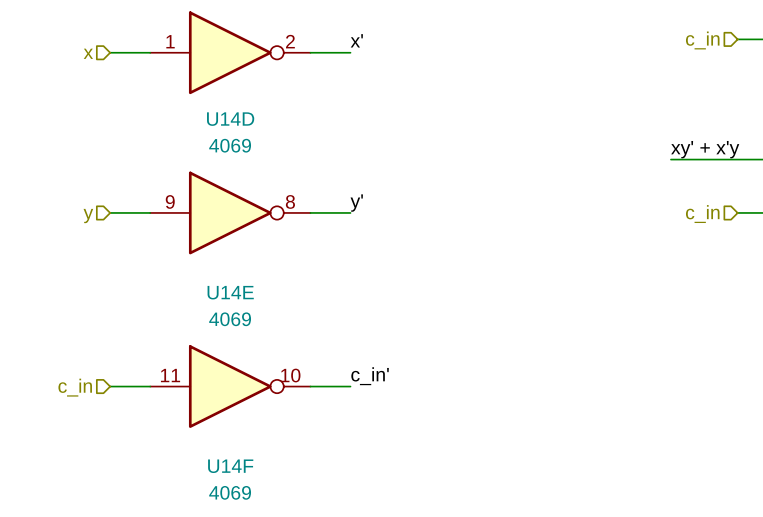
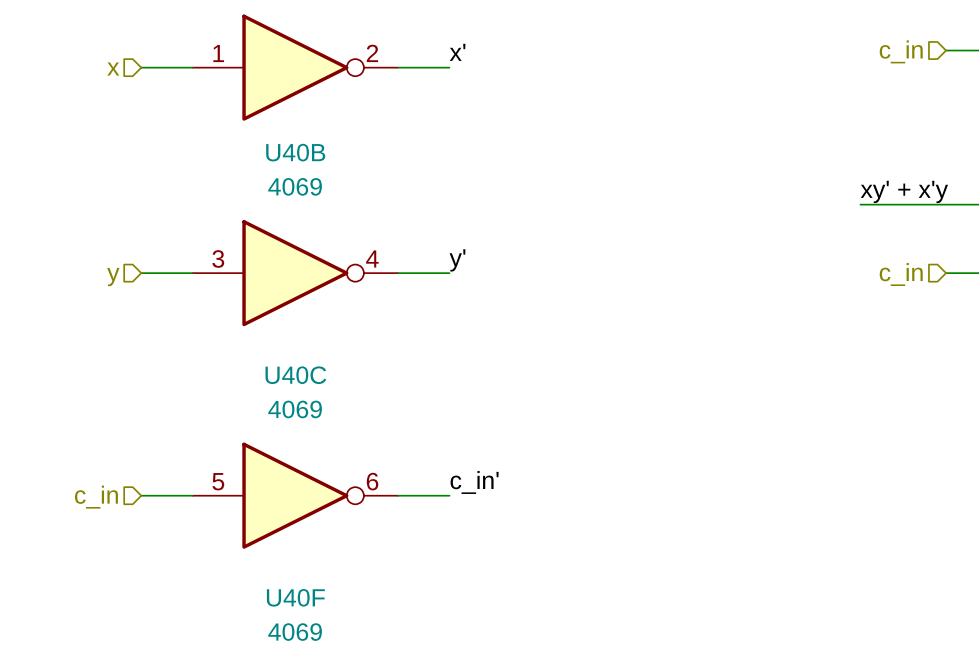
U14D name: U14D (230, 119) -> U40B (295, 152)
U14D pin number: 9 (170, 201) -> 3 (218, 258)
U14D pin number: 8 (290, 201) -> 4 (372, 259)
U14E name: U14E (230, 292) -> U40C (295, 375)
U14E pin number: 11 (170, 375) -> 5 (218, 481)
U14E pin number: 10 (290, 375) -> 6 (372, 481)
U14F name: U14F (230, 466) -> U40F (295, 597)

